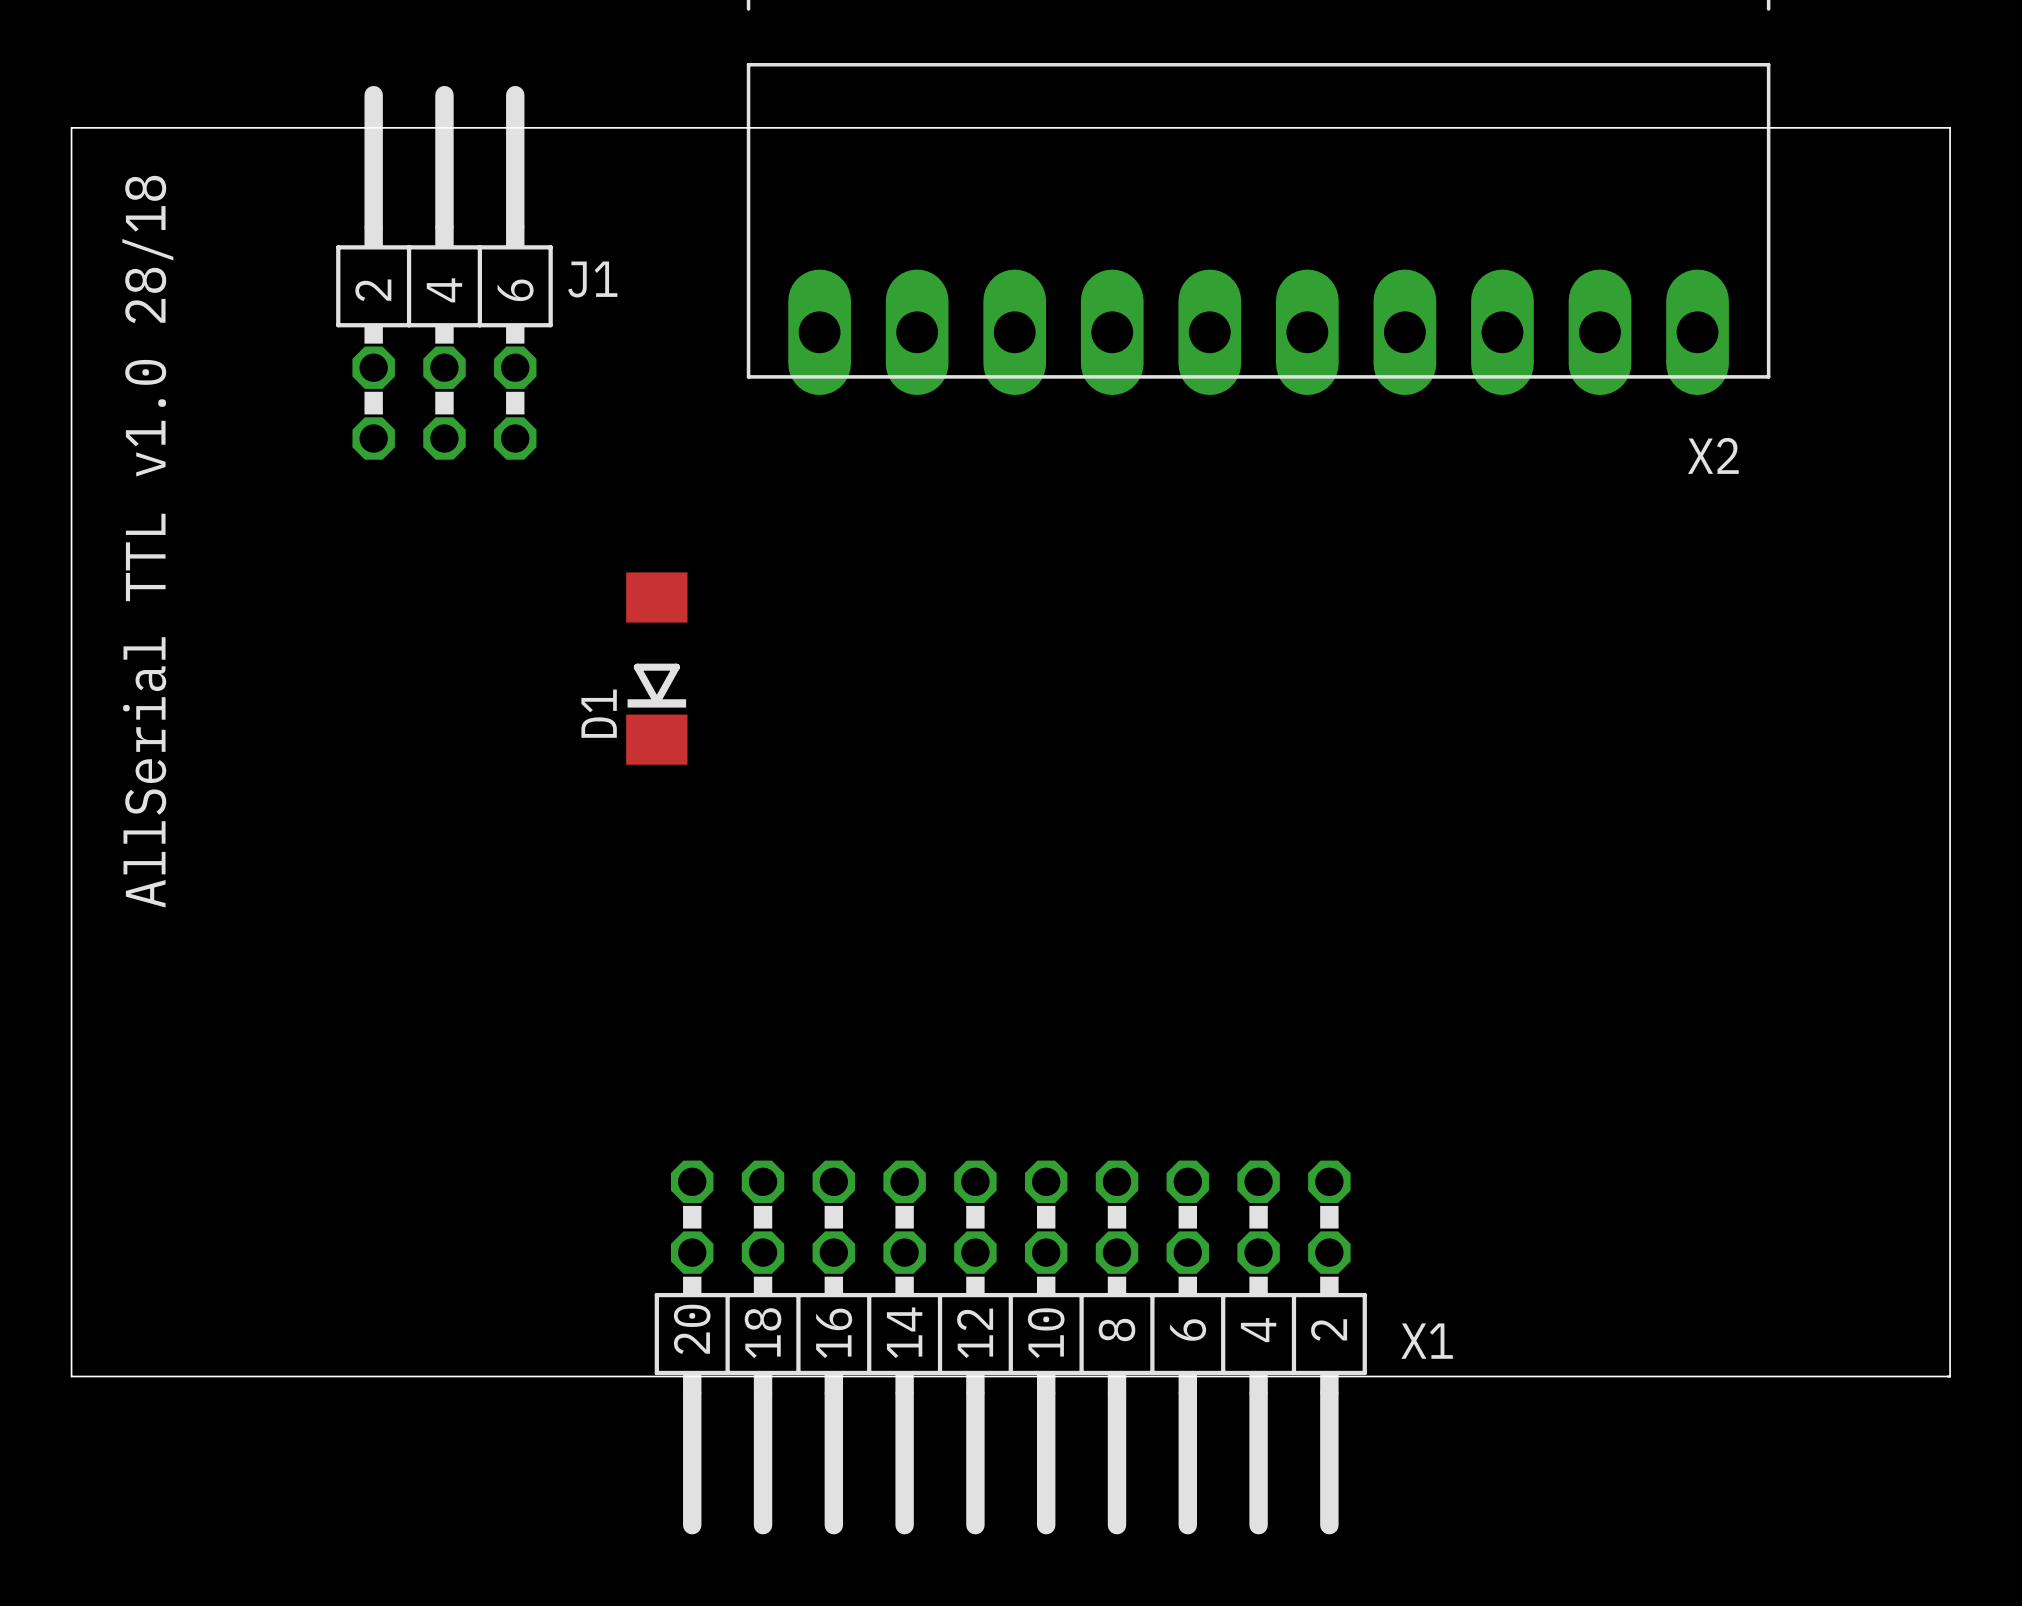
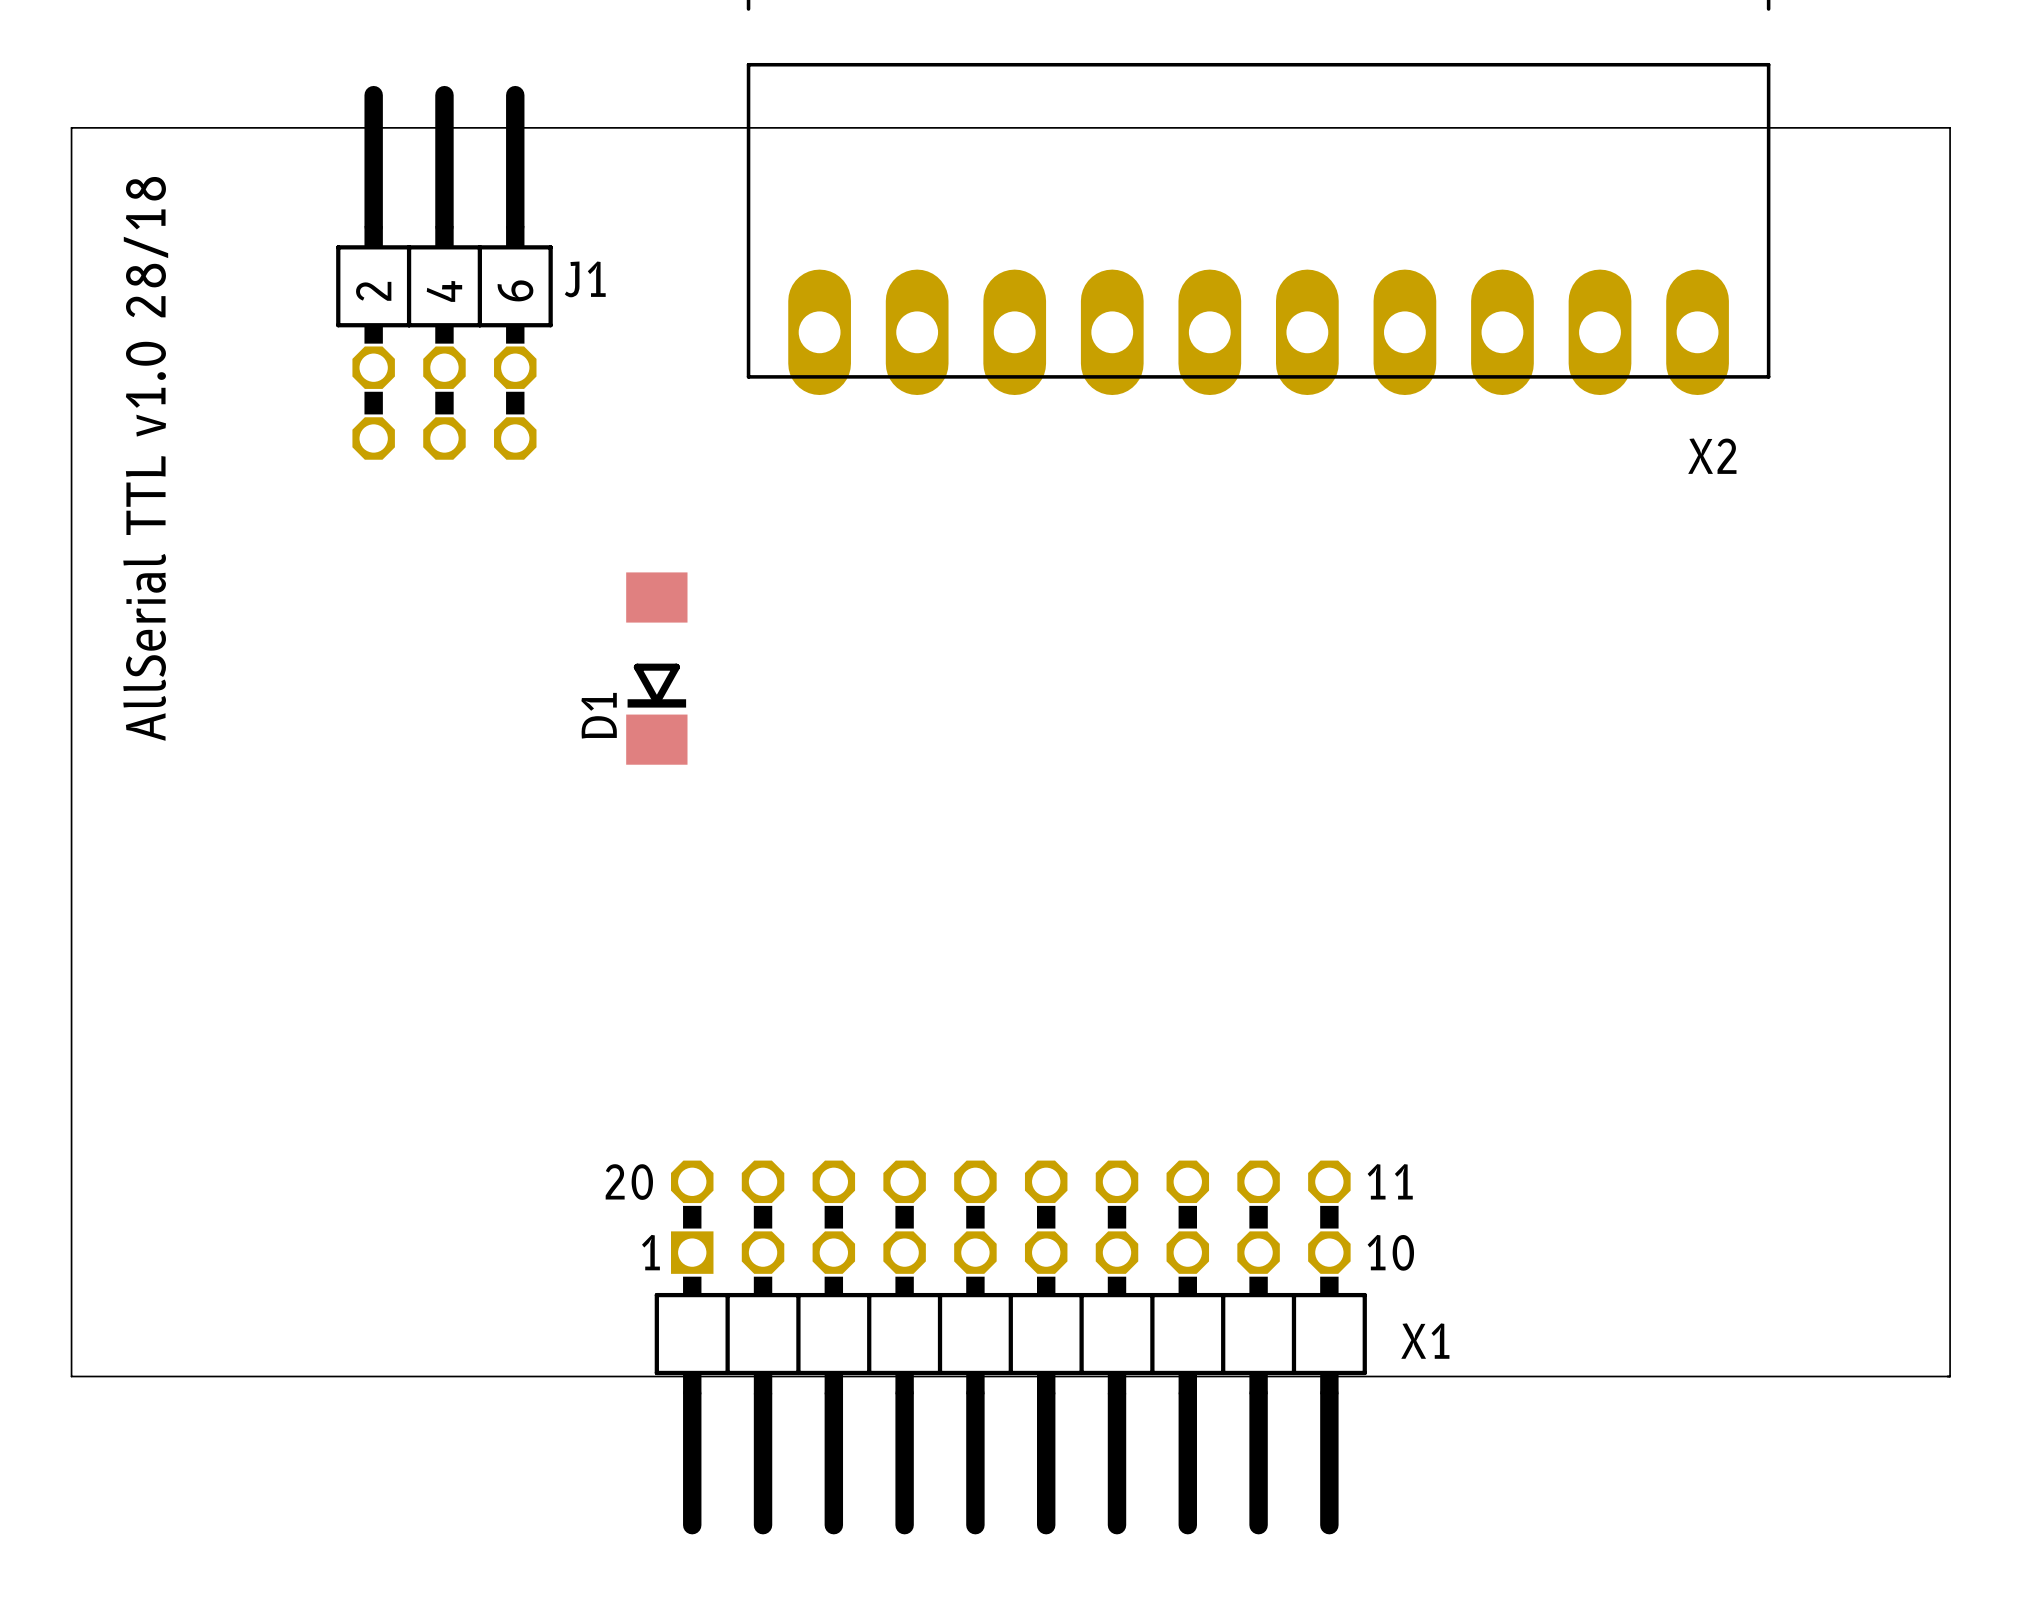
X1 footprint: [71, 127, 1951, 1535] -> [71, 127, 1951, 1535]

